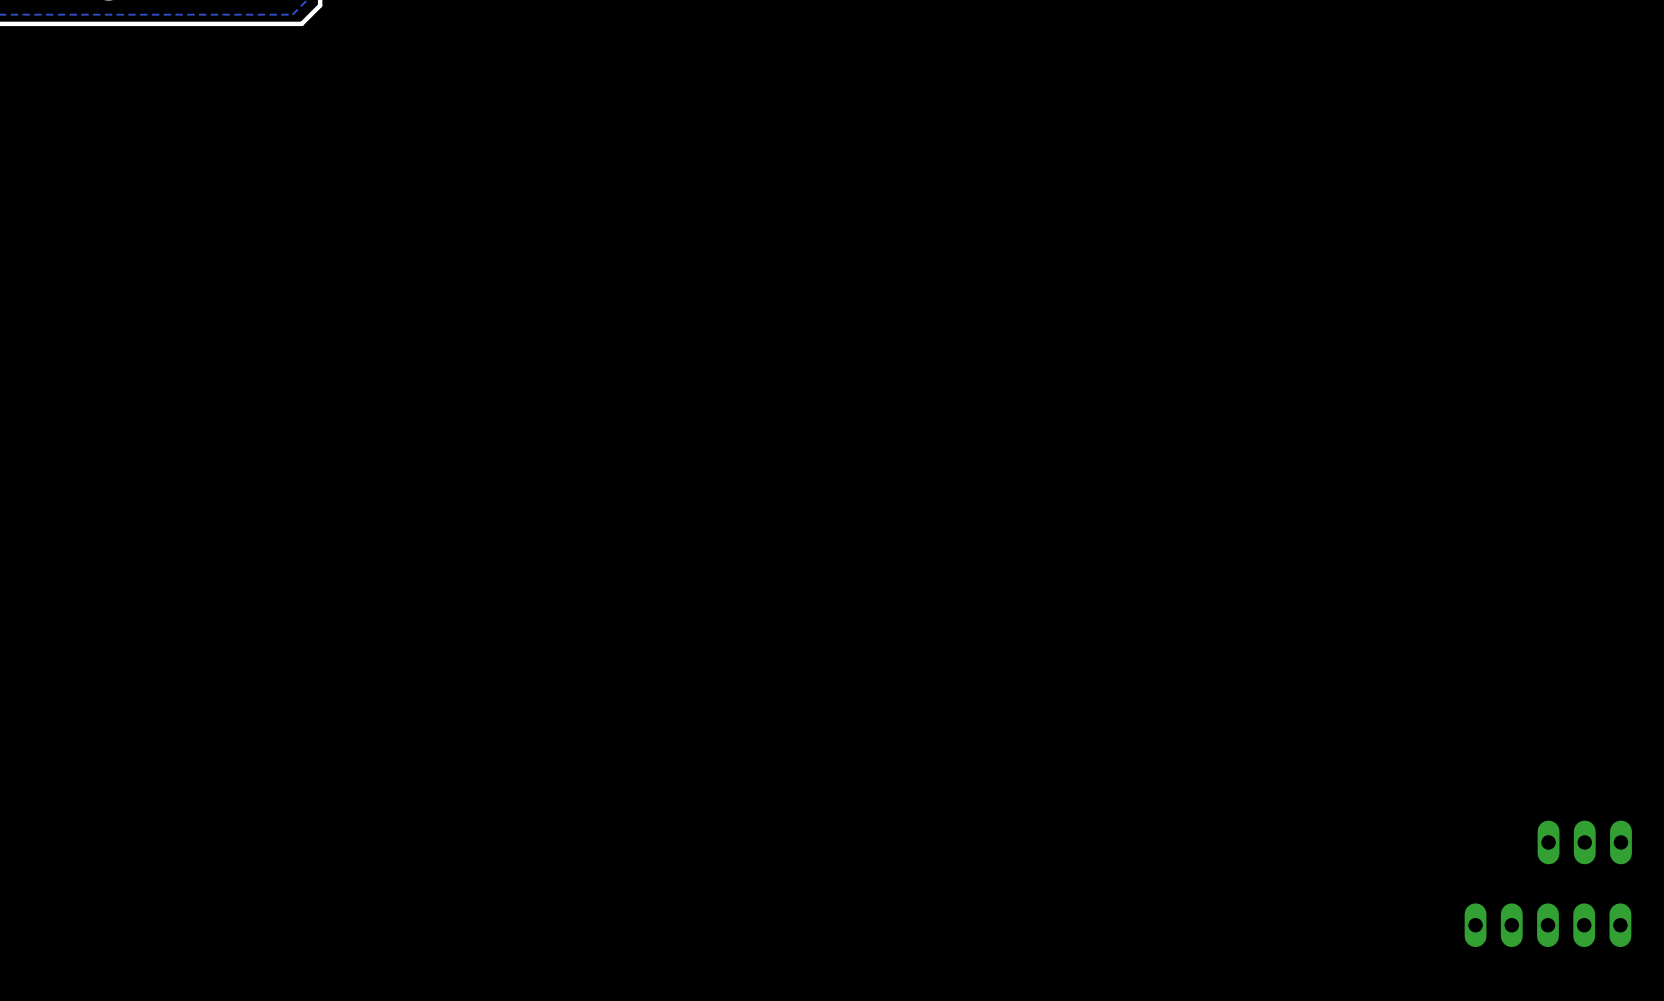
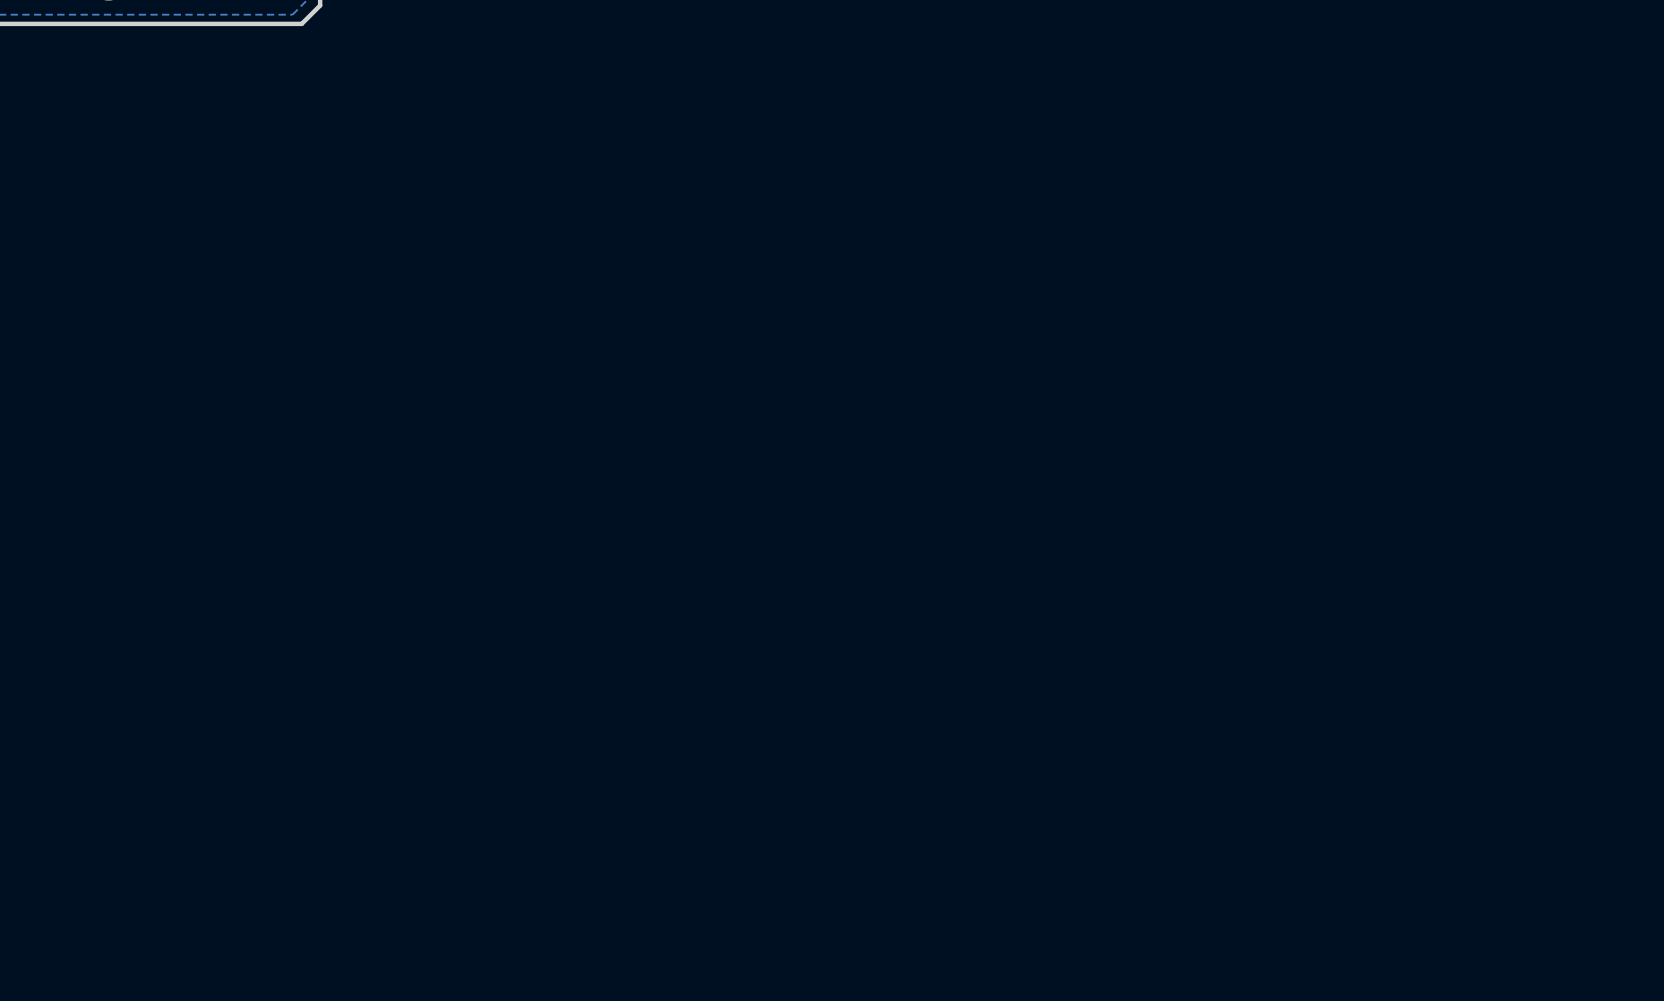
part: (1584, 842) -> none
part: (1547, 925) -> none

